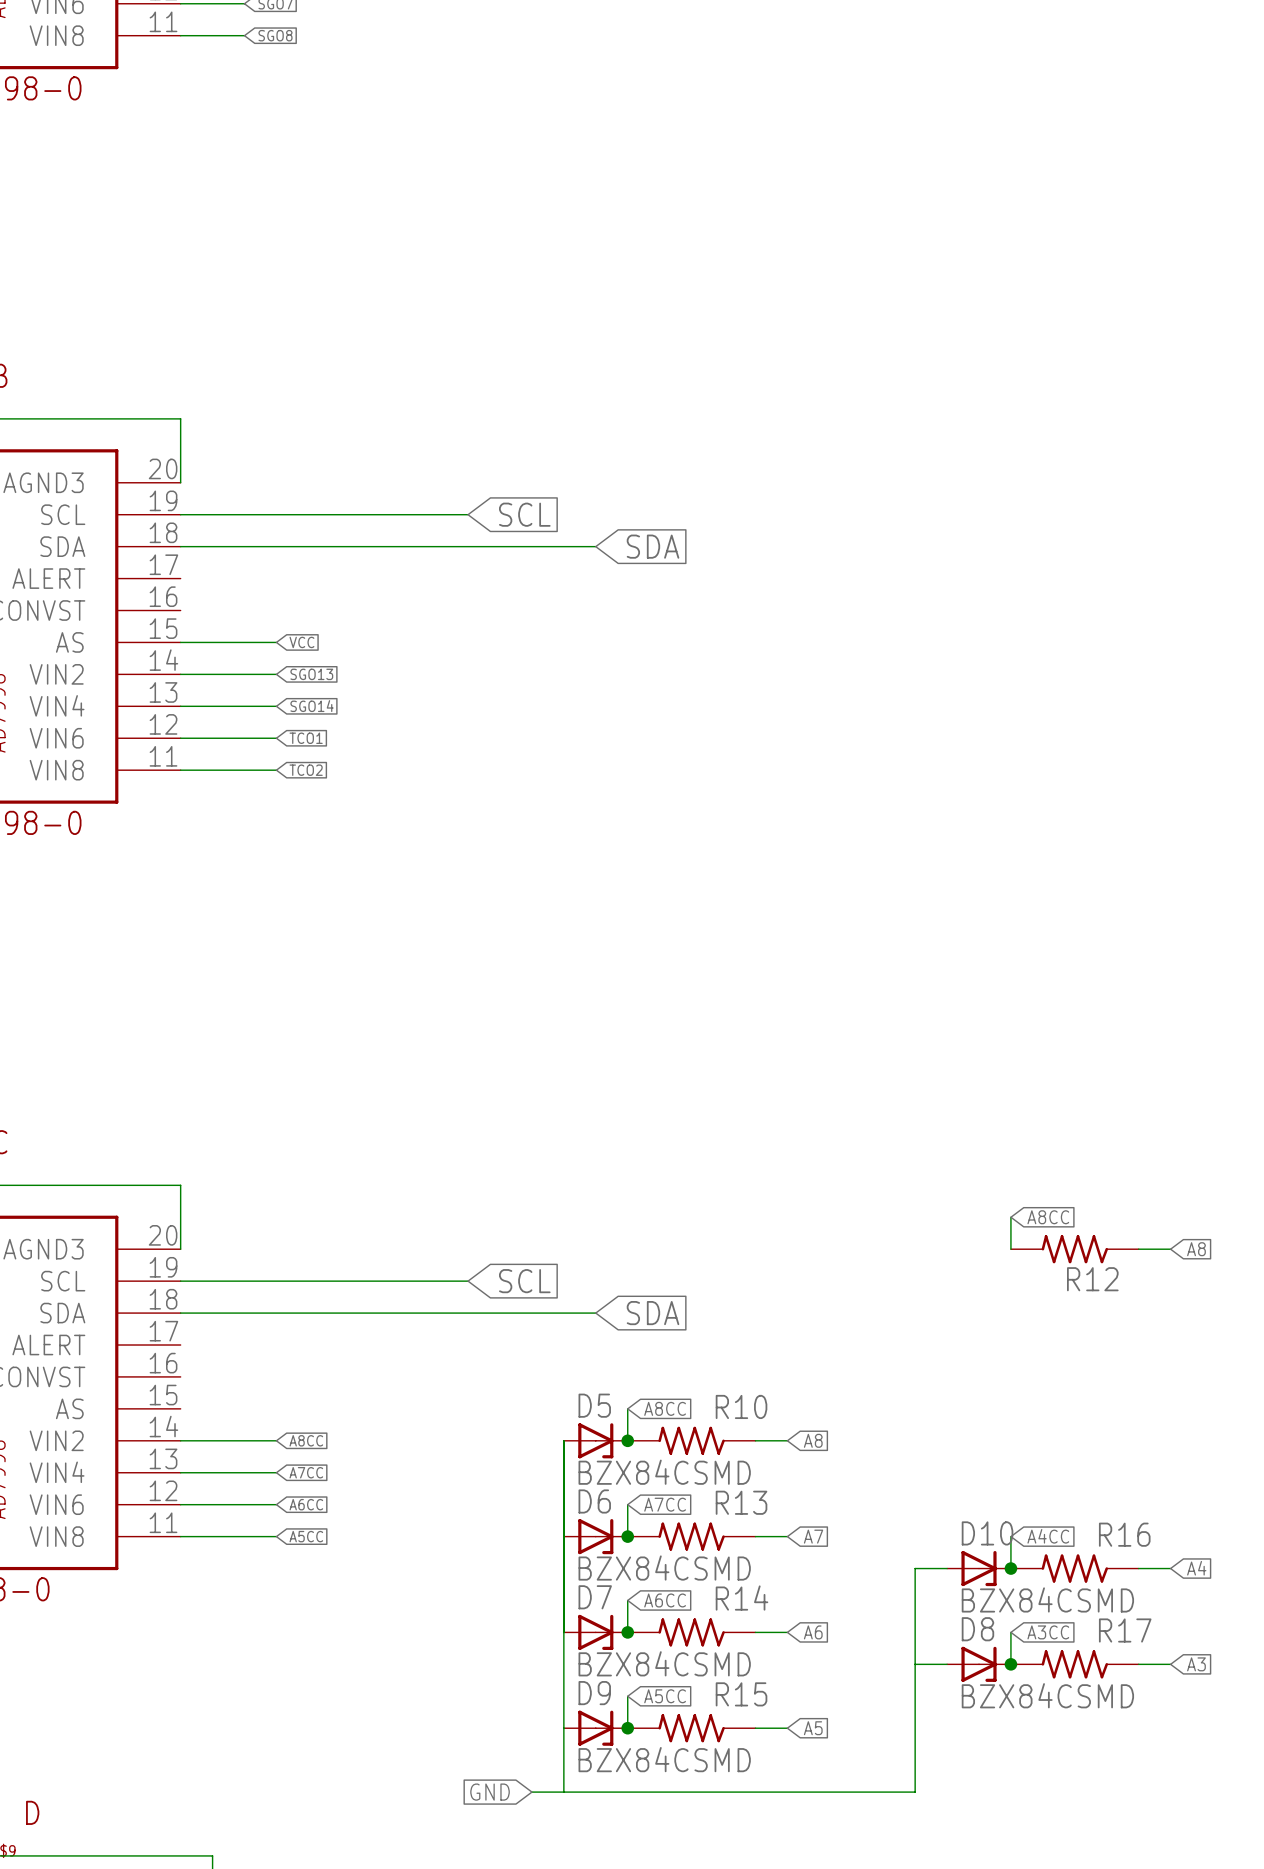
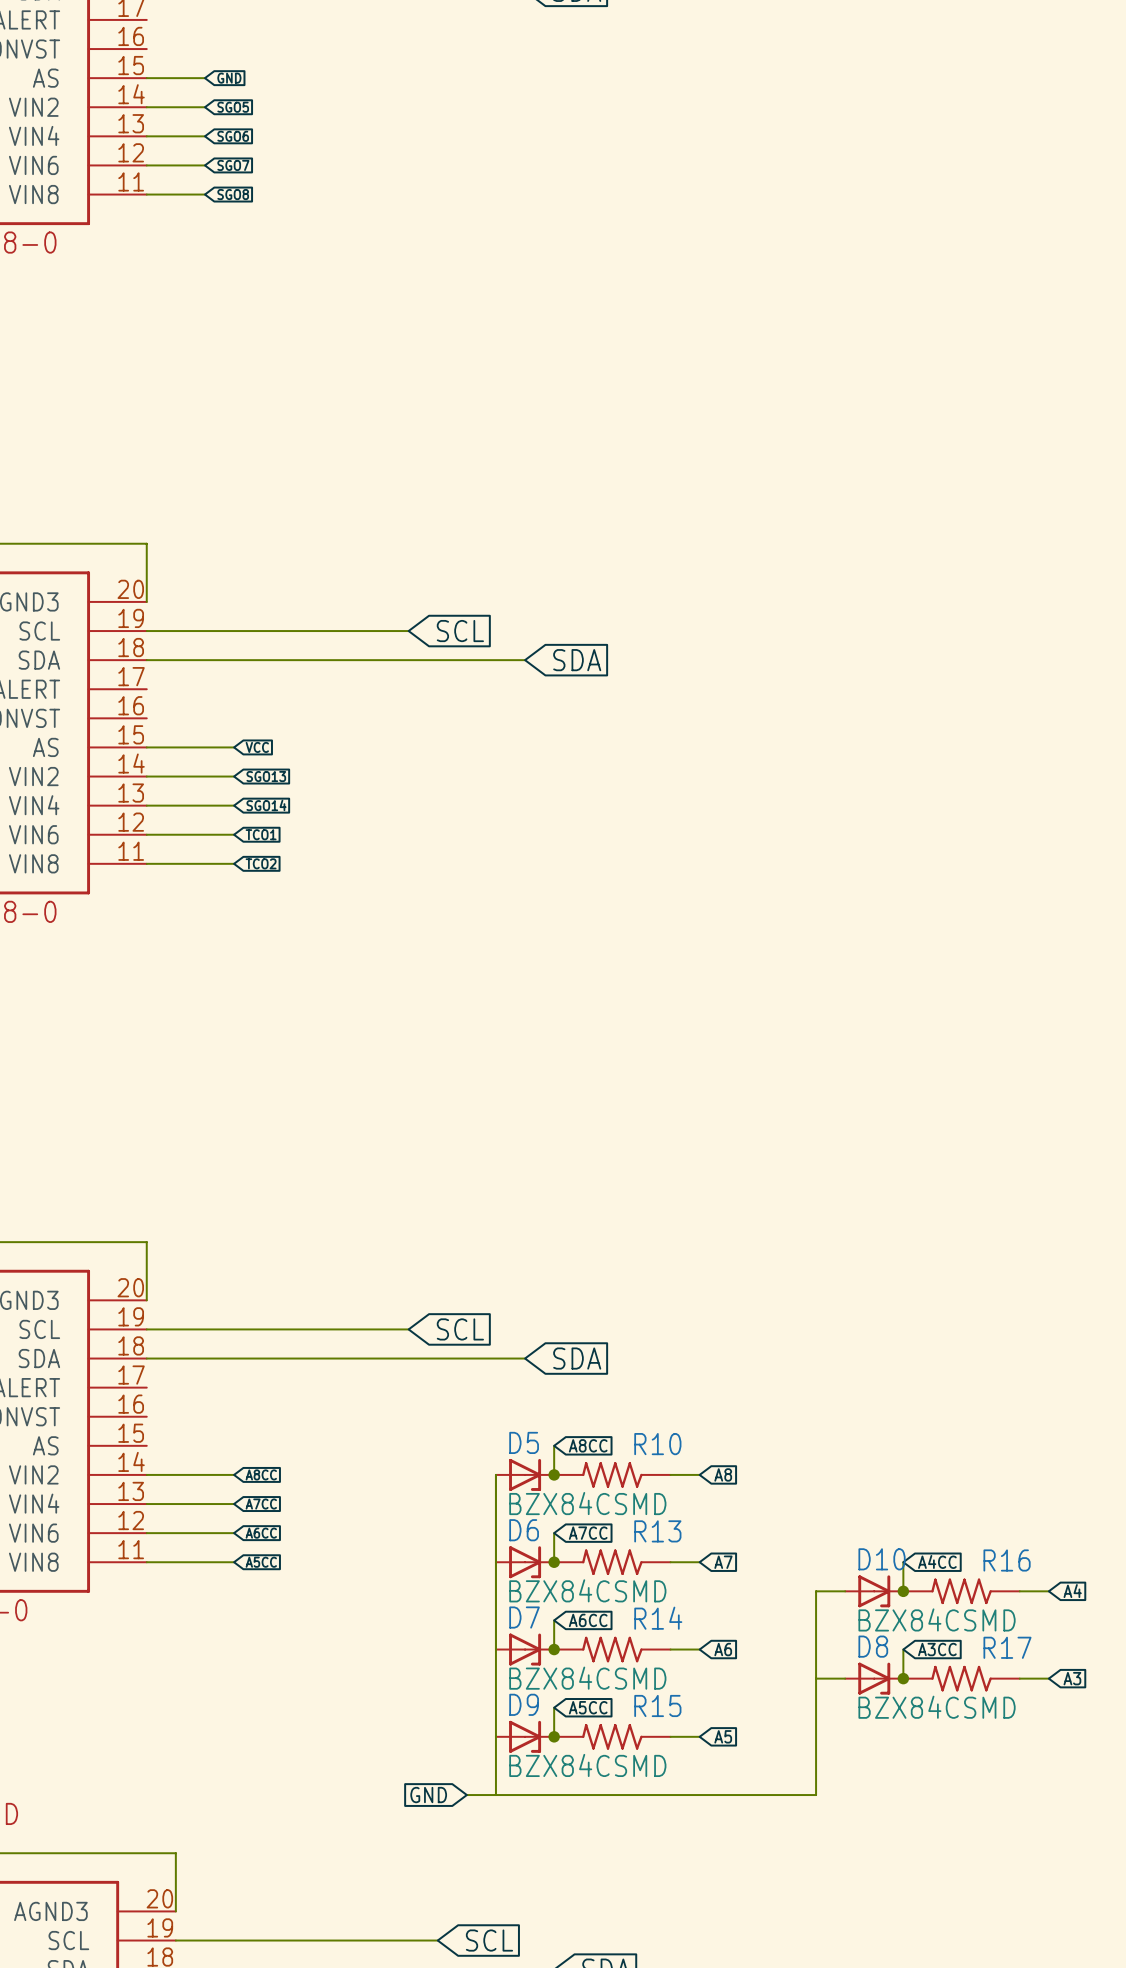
wire: (1010, 1217) (1010, 1249) -> none
global label: A8CC (1048, 1217) -> none
R12: (1074, 1249) -> none
wire: (1138, 1249) (1170, 1249) -> none
global label: A8 (1196, 1249) -> none

